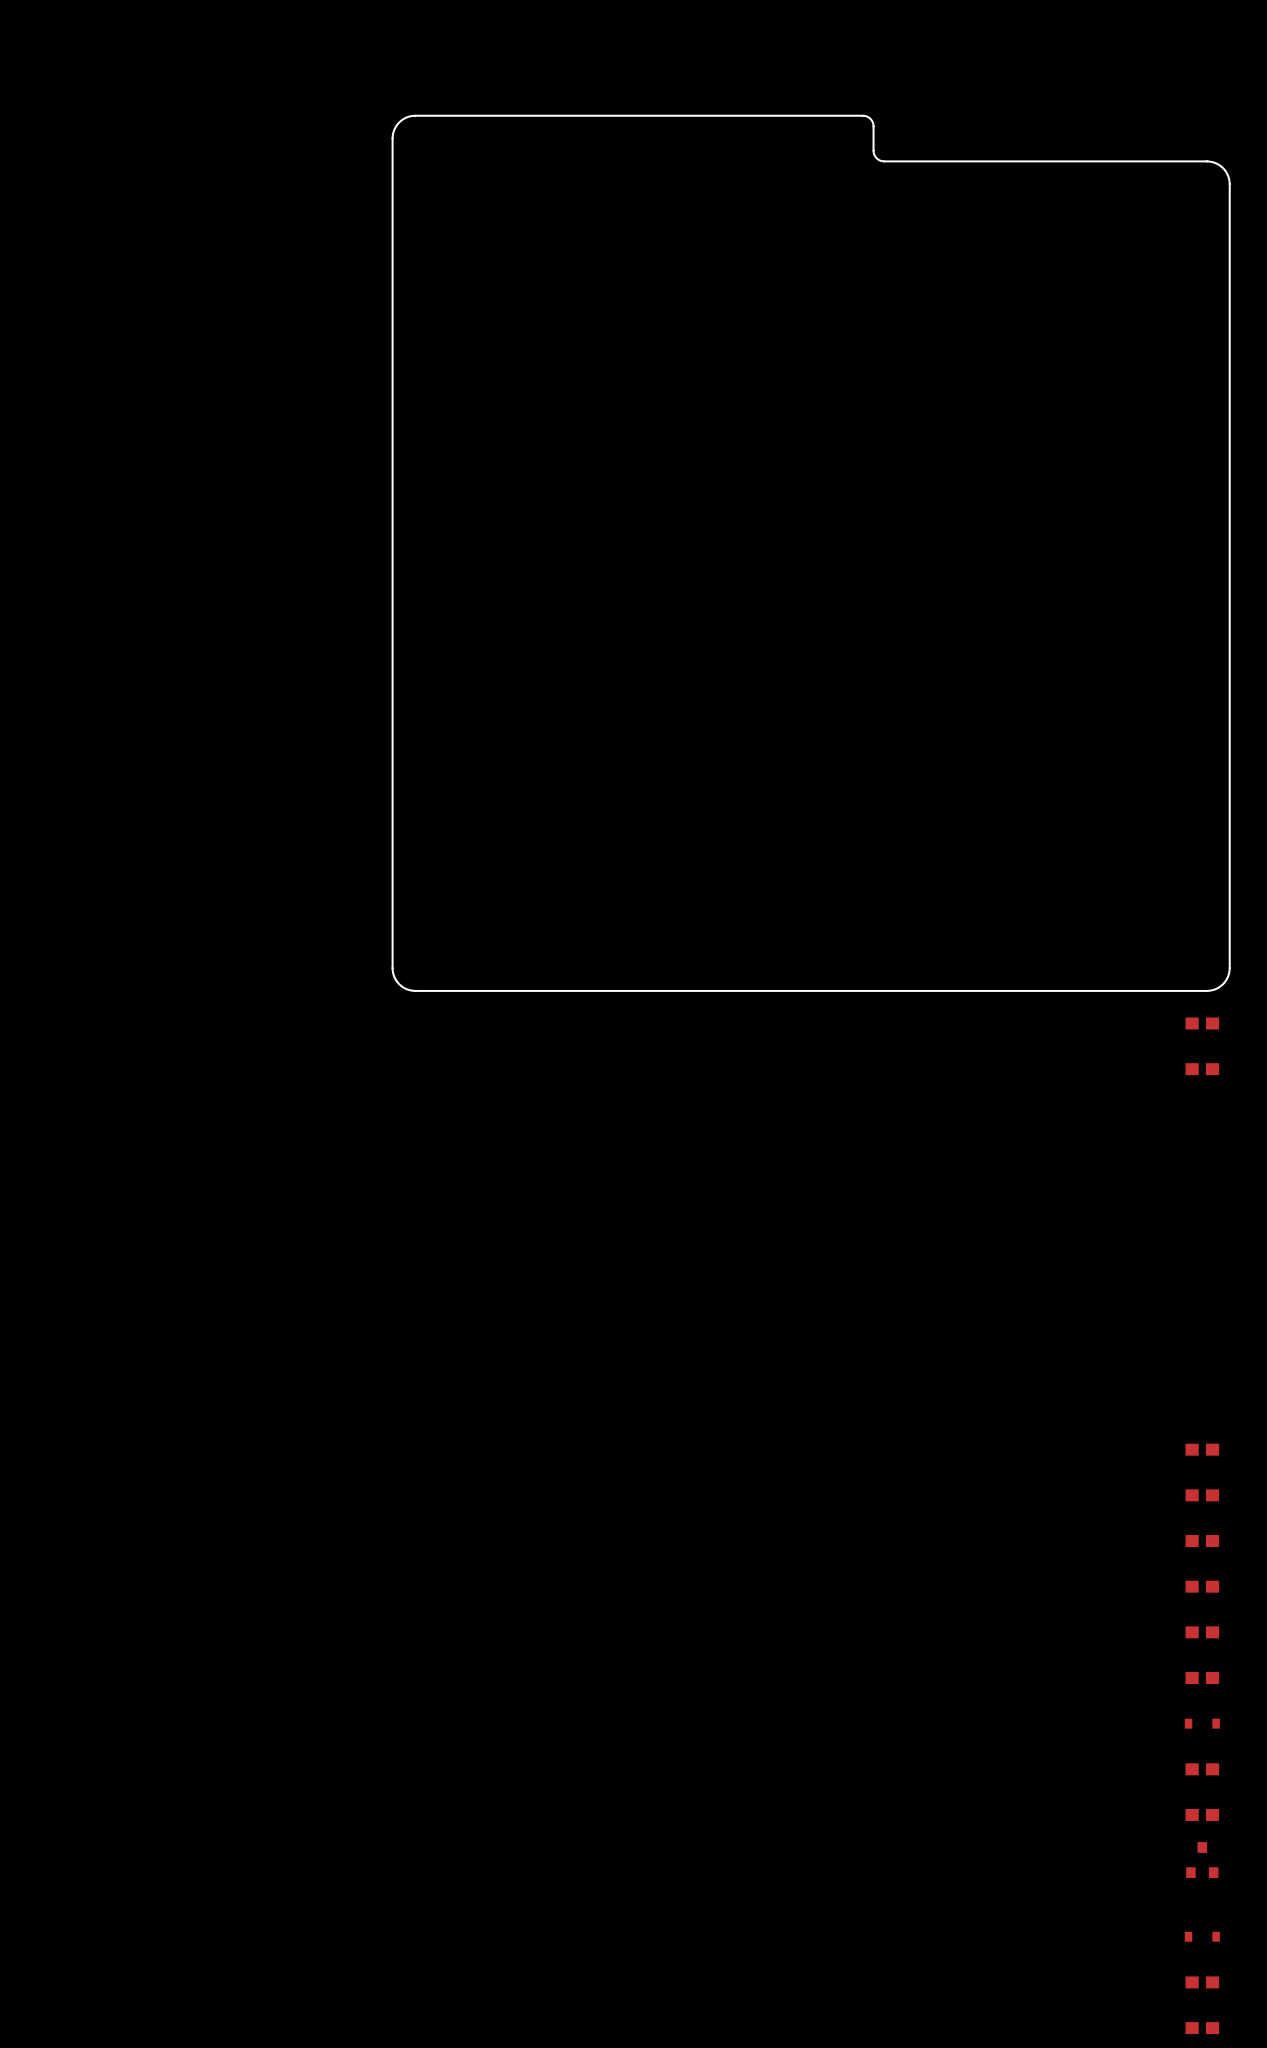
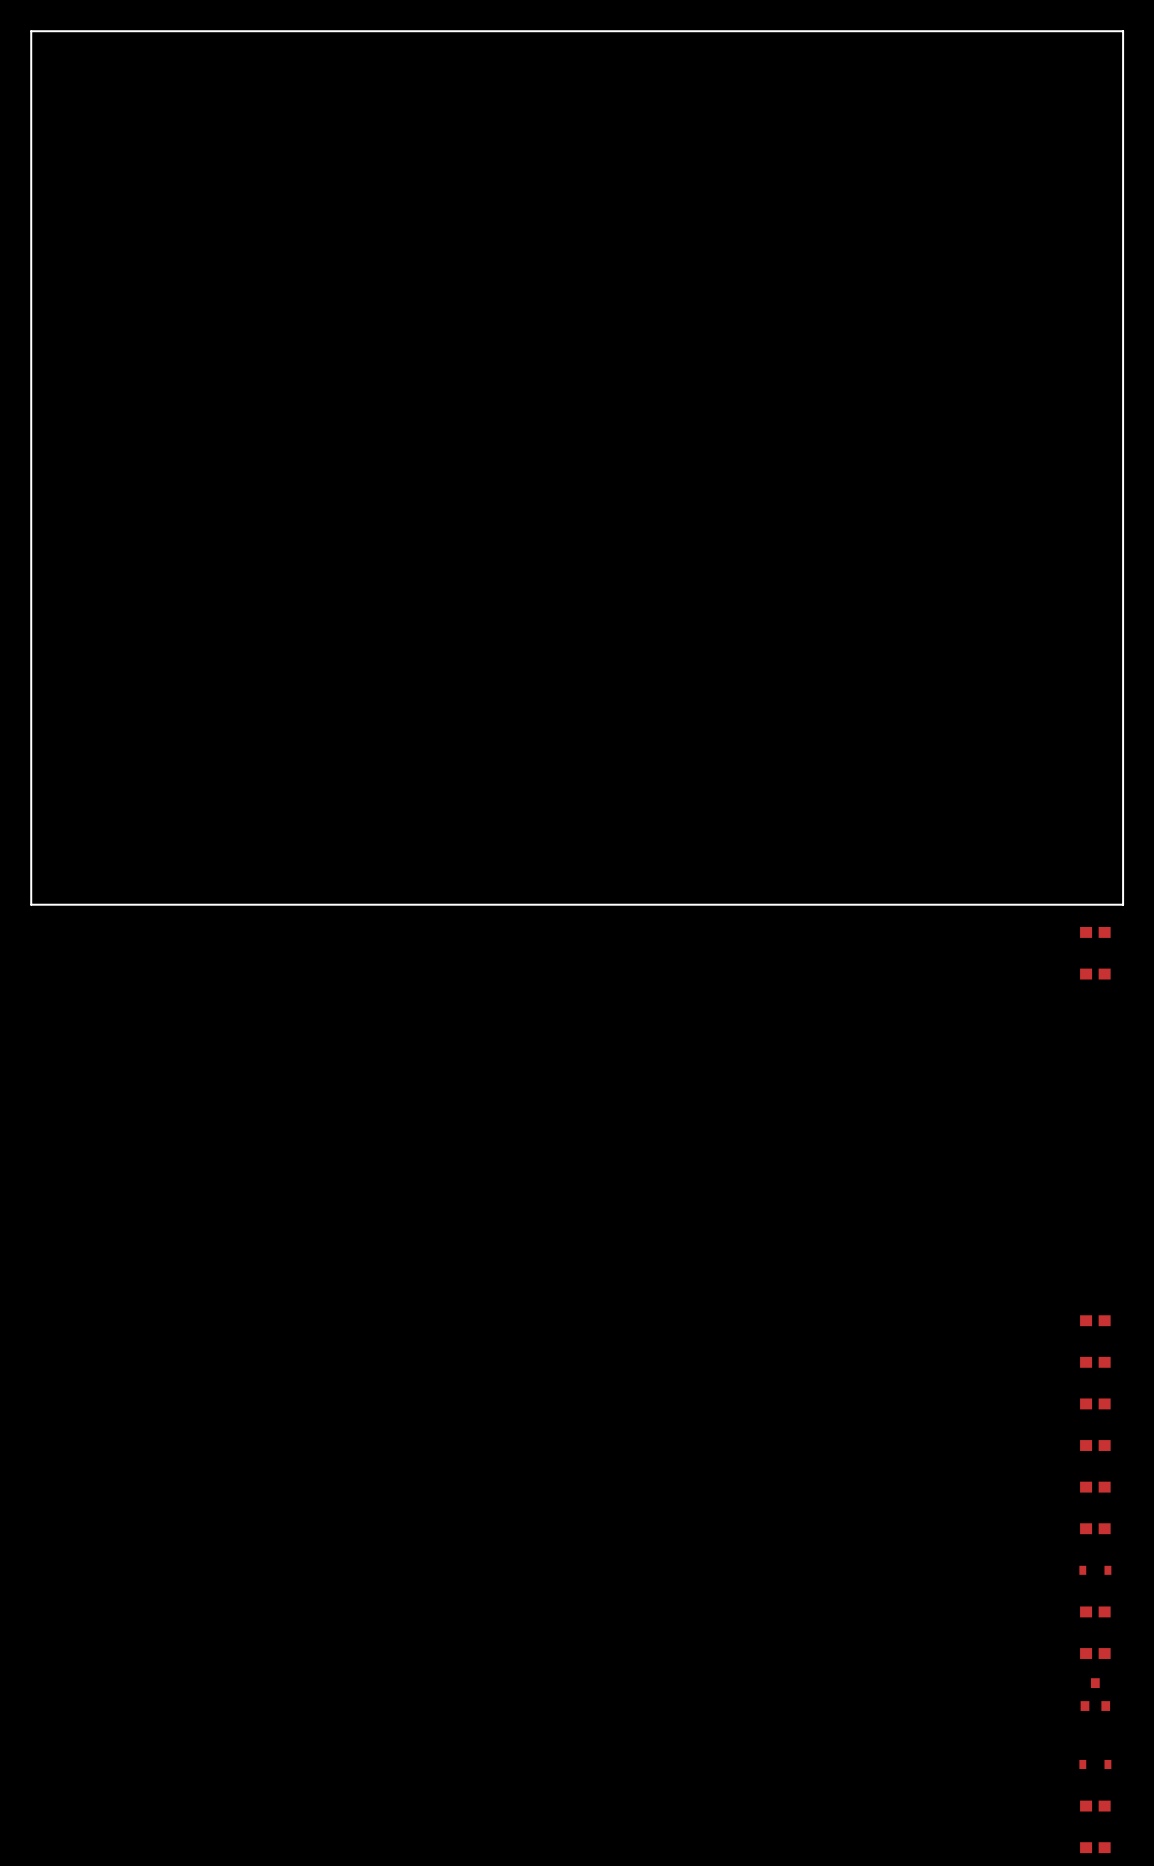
board edge: (862, 115) (415, 115) (403, 118) (395, 127) (392, 138) (392, 968) (395, 979) (403, 987) (415, 990) (1206, 990) (1218, 987) (1226, 979) (1229, 968) (1229, 184) (1227, 175) (1218, 164) (1206, 161) (882, 161) (877, 159) (873, 153) (872, 122) (869, 117) (862, 115) -> (1123, 31) (1123, 904) (31, 904) (31, 31) (1123, 31)

